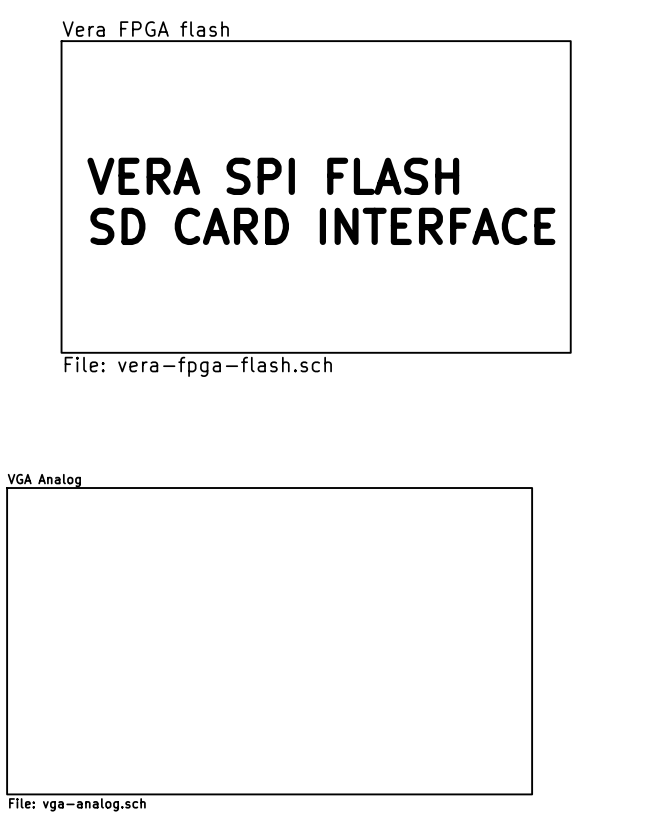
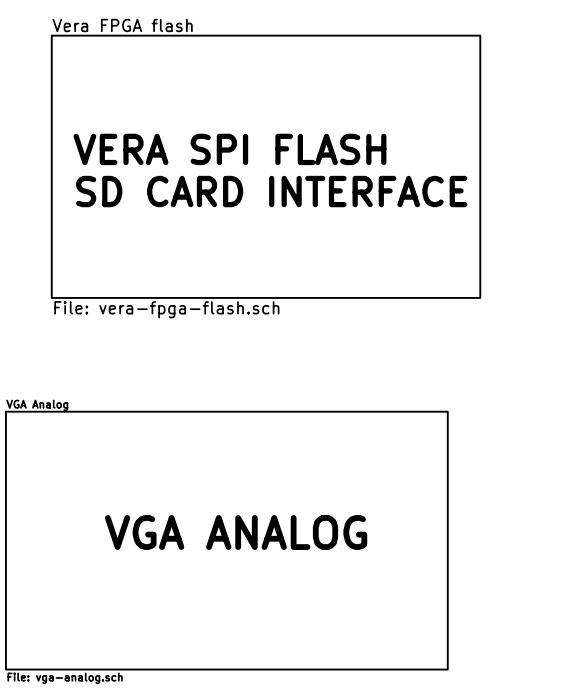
text: none -> VGA ANALOG (236, 532)

